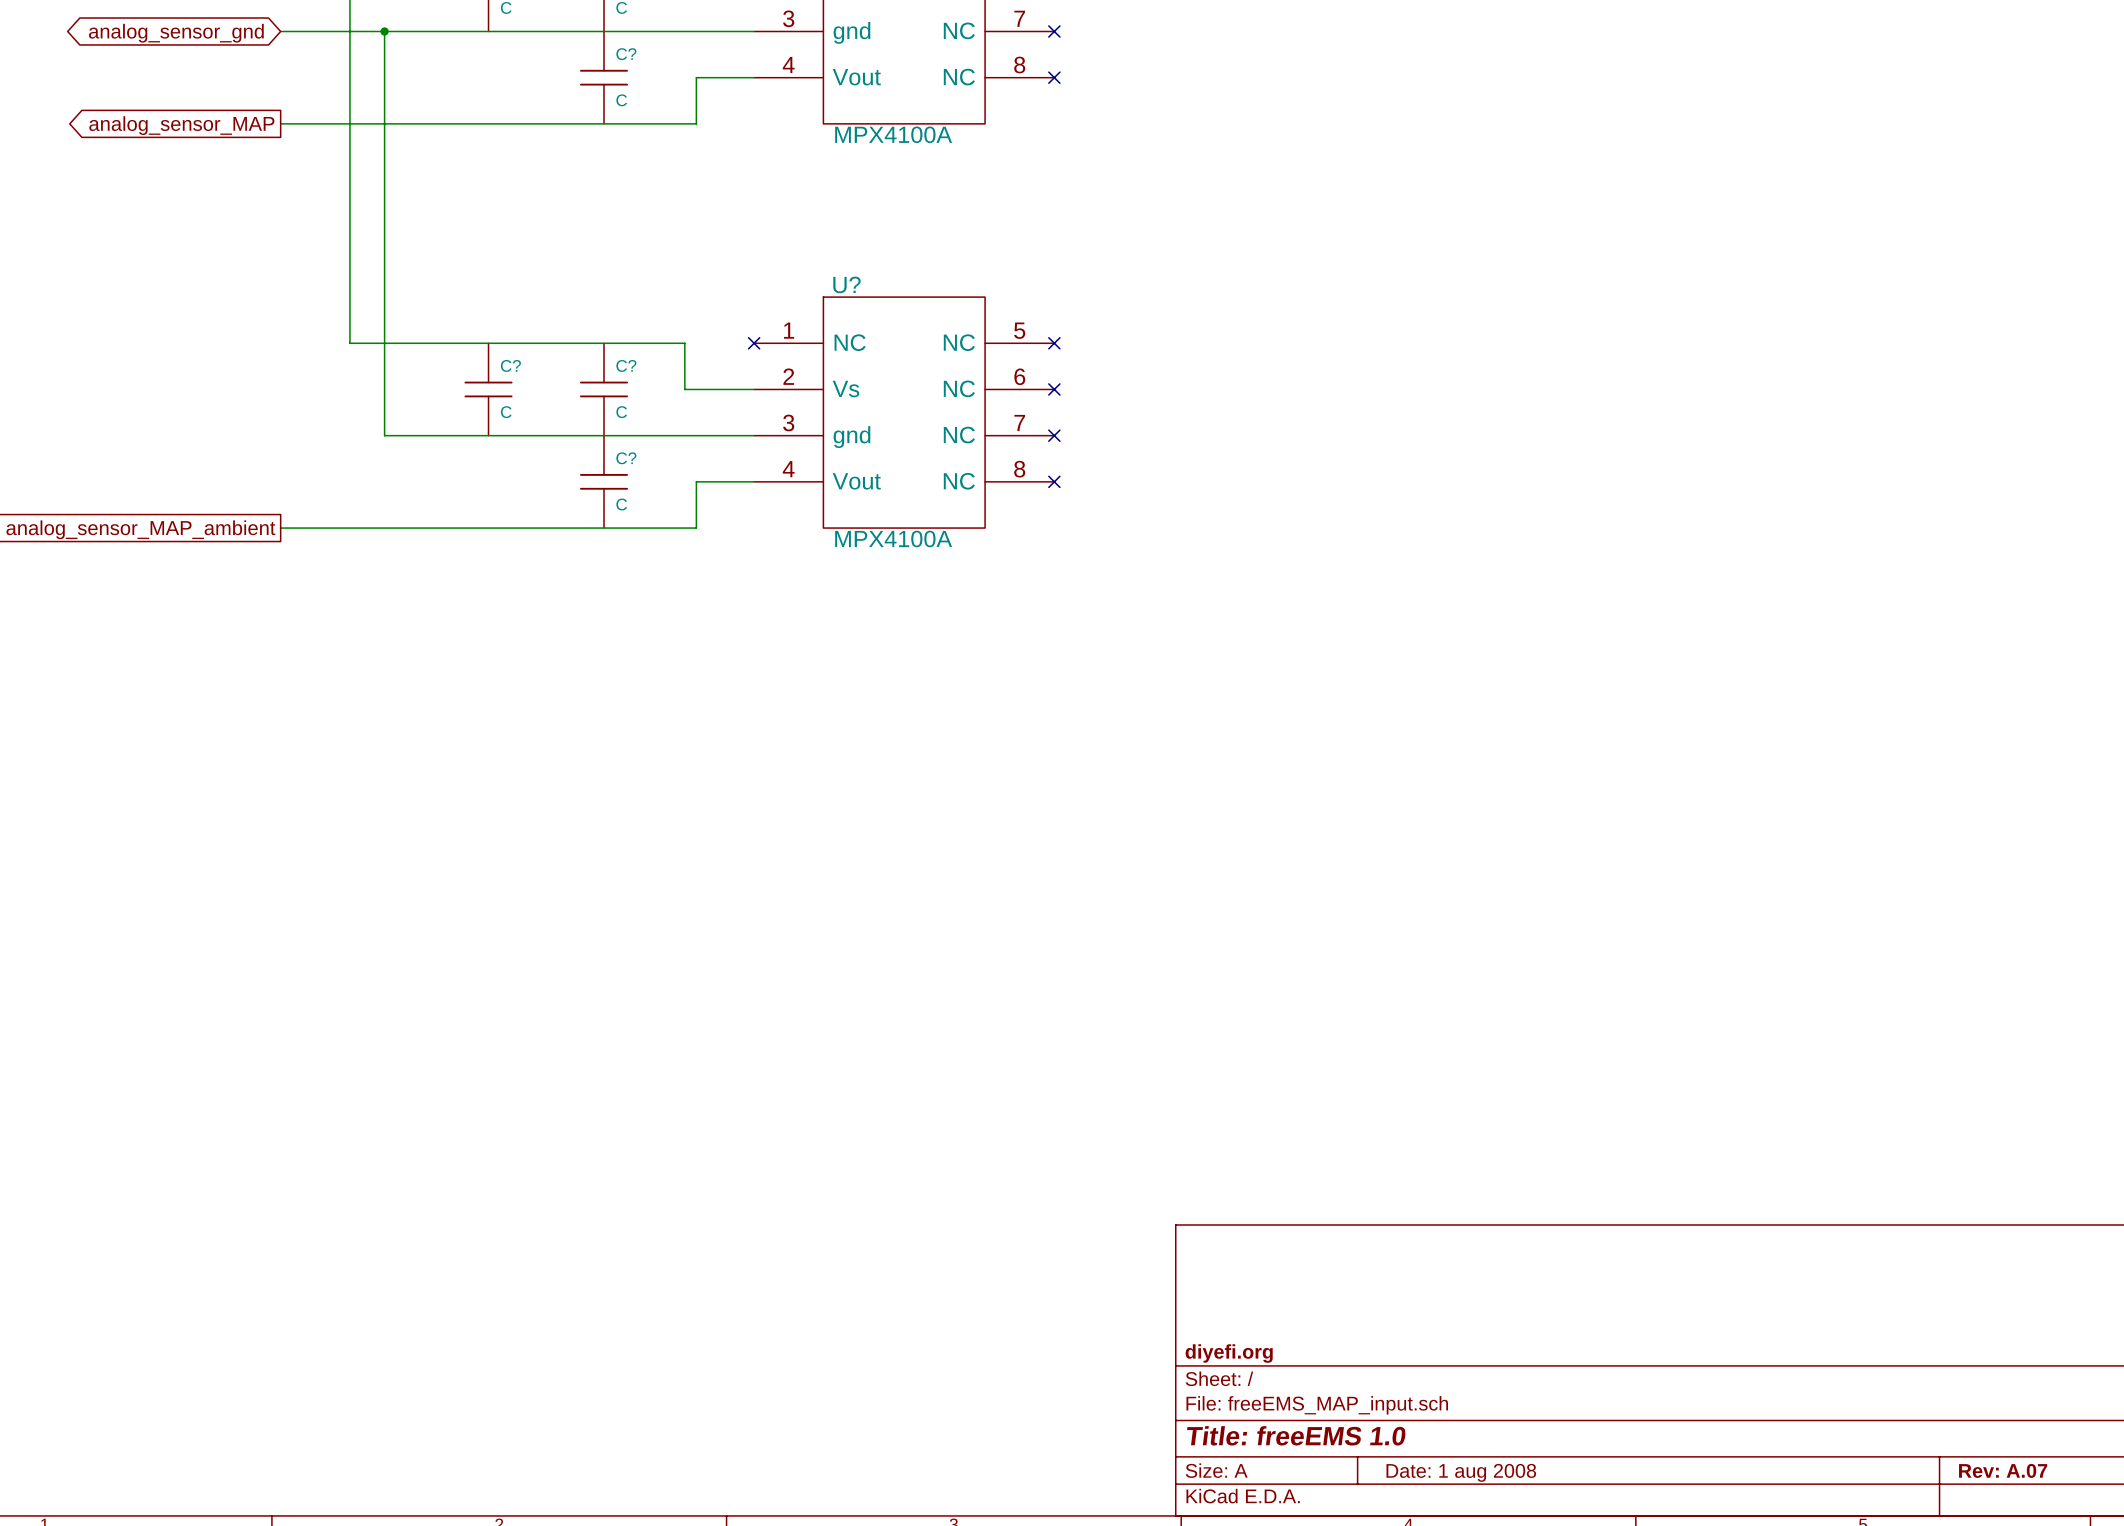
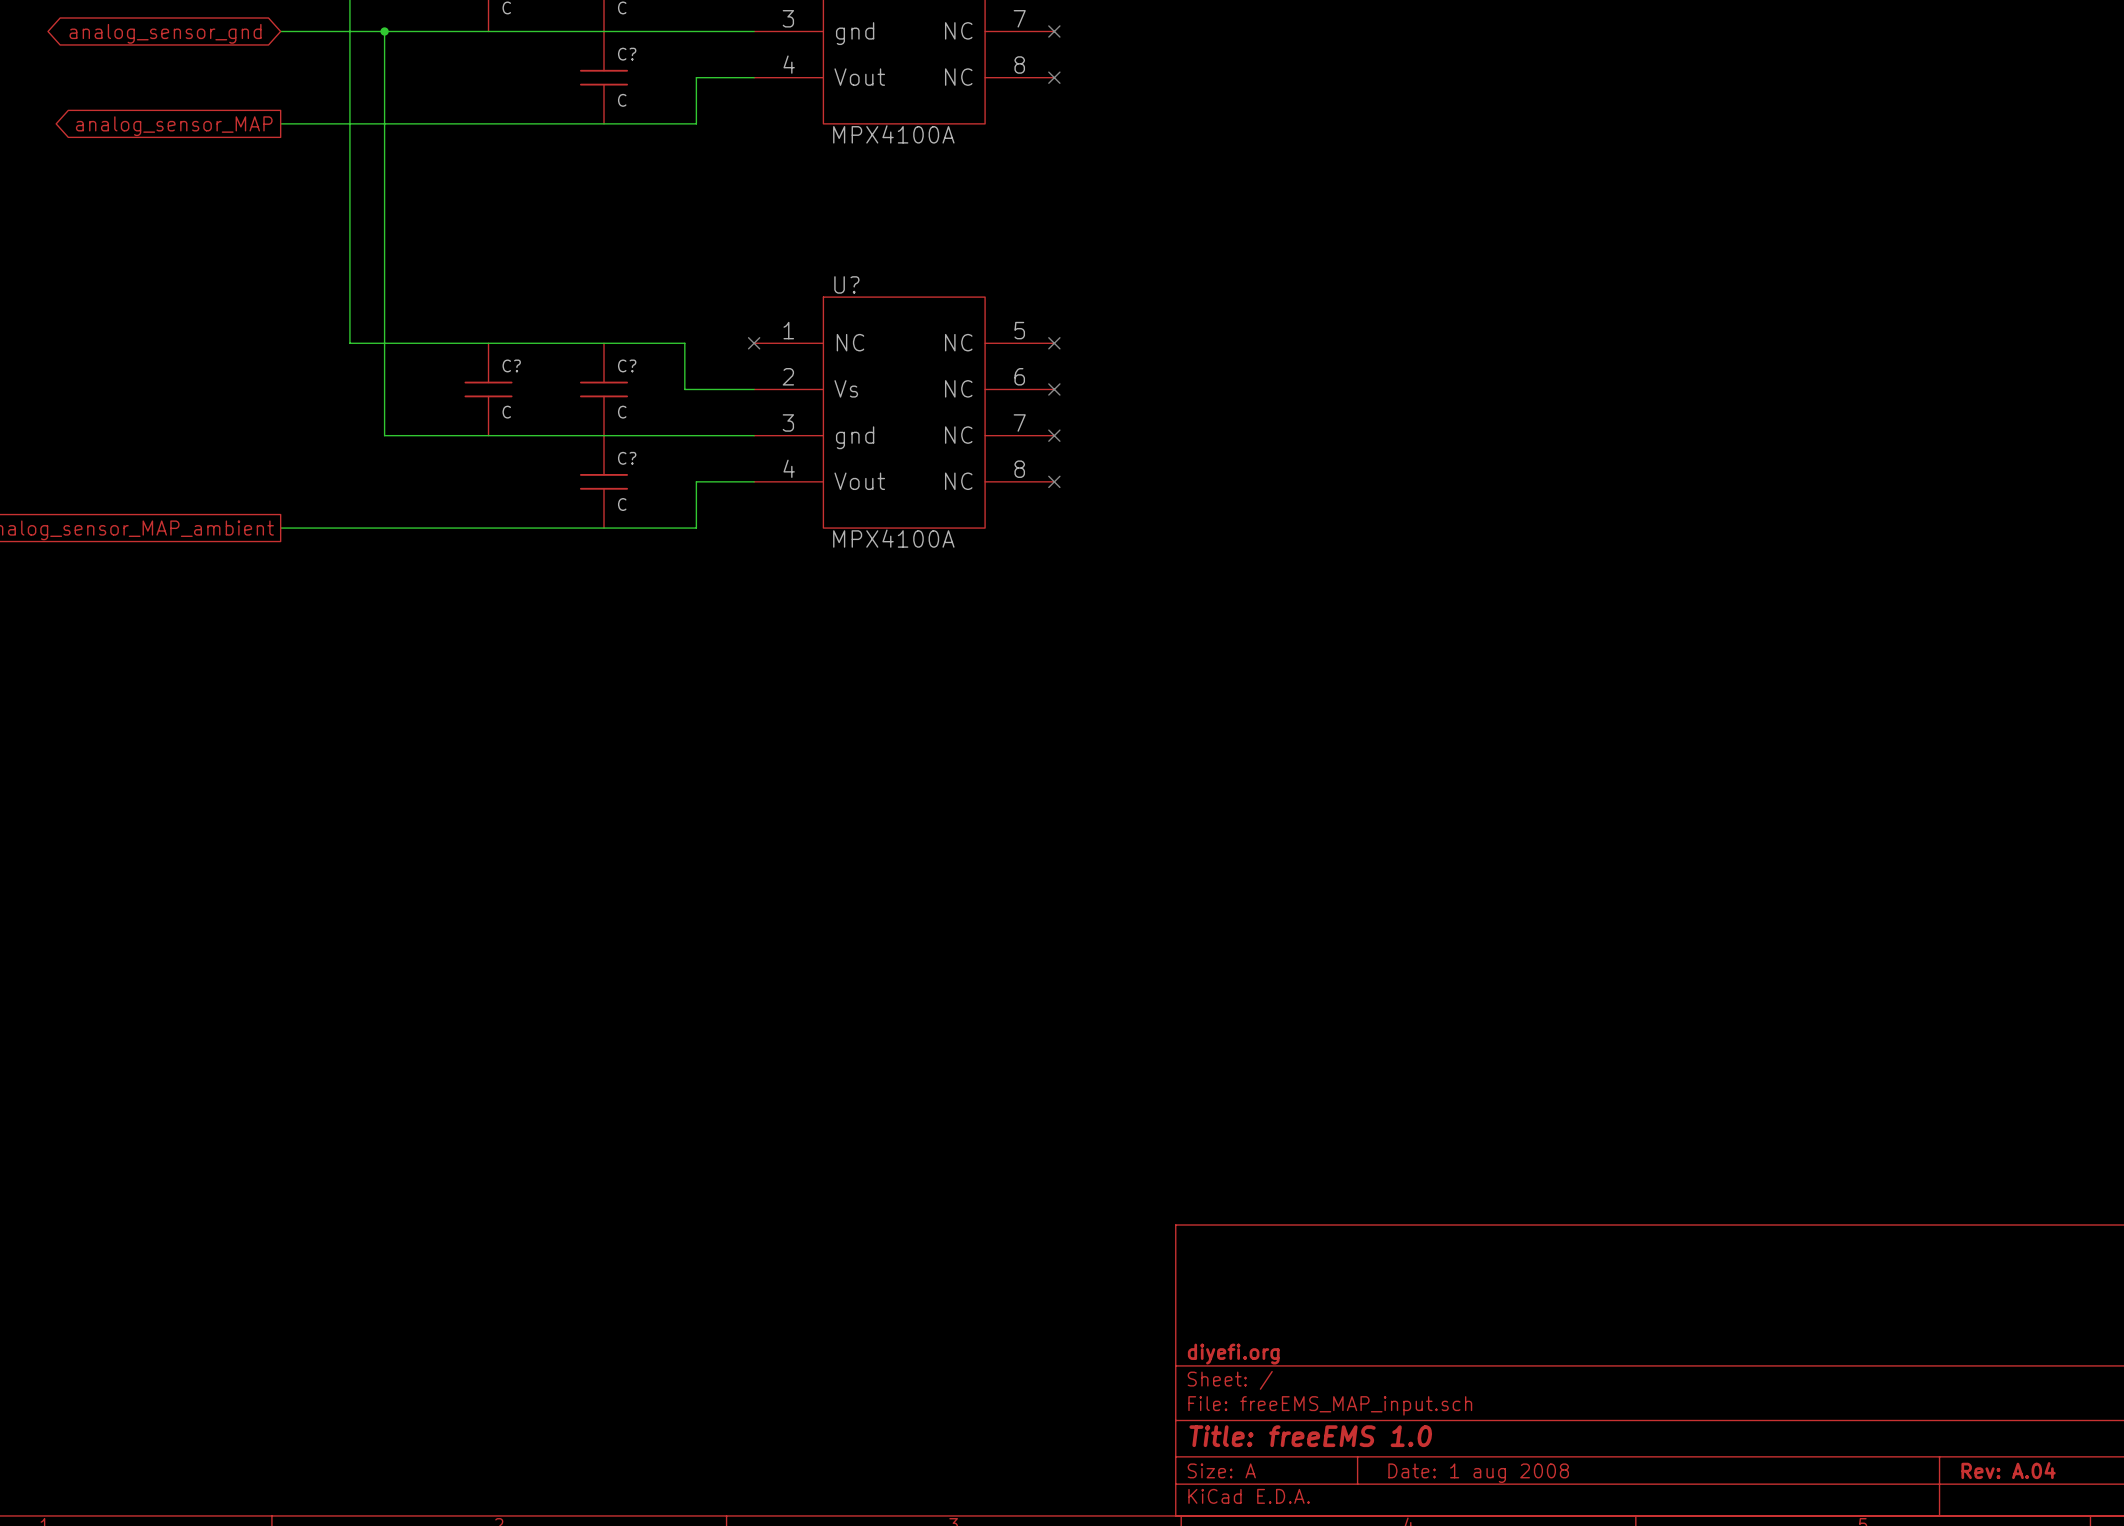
title block: Rev: A.07 (2003, 1470) -> Rev: A.04 (2008, 1470)

